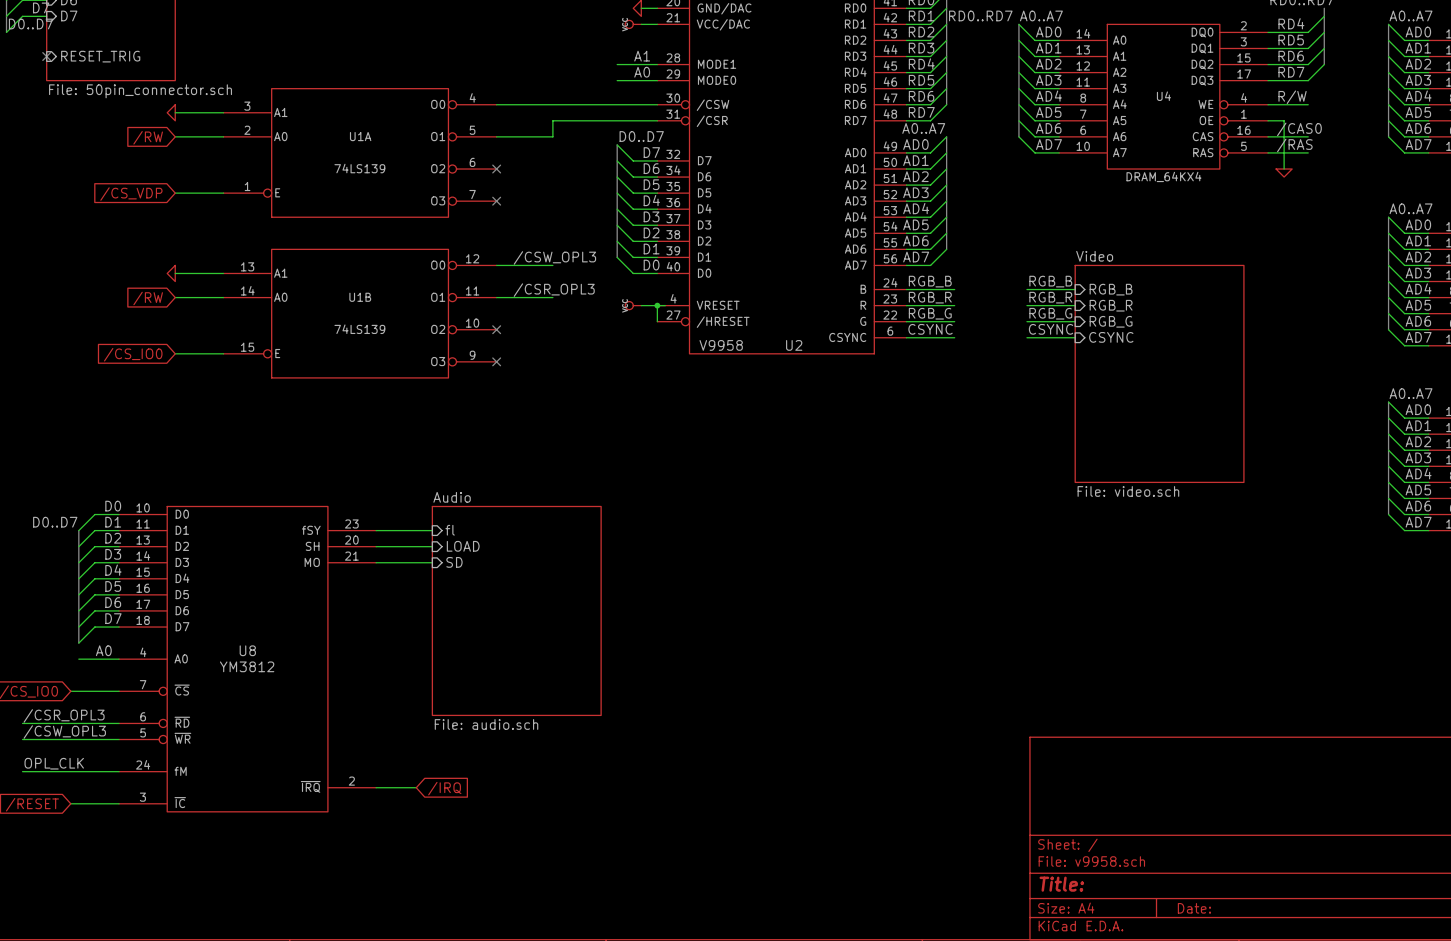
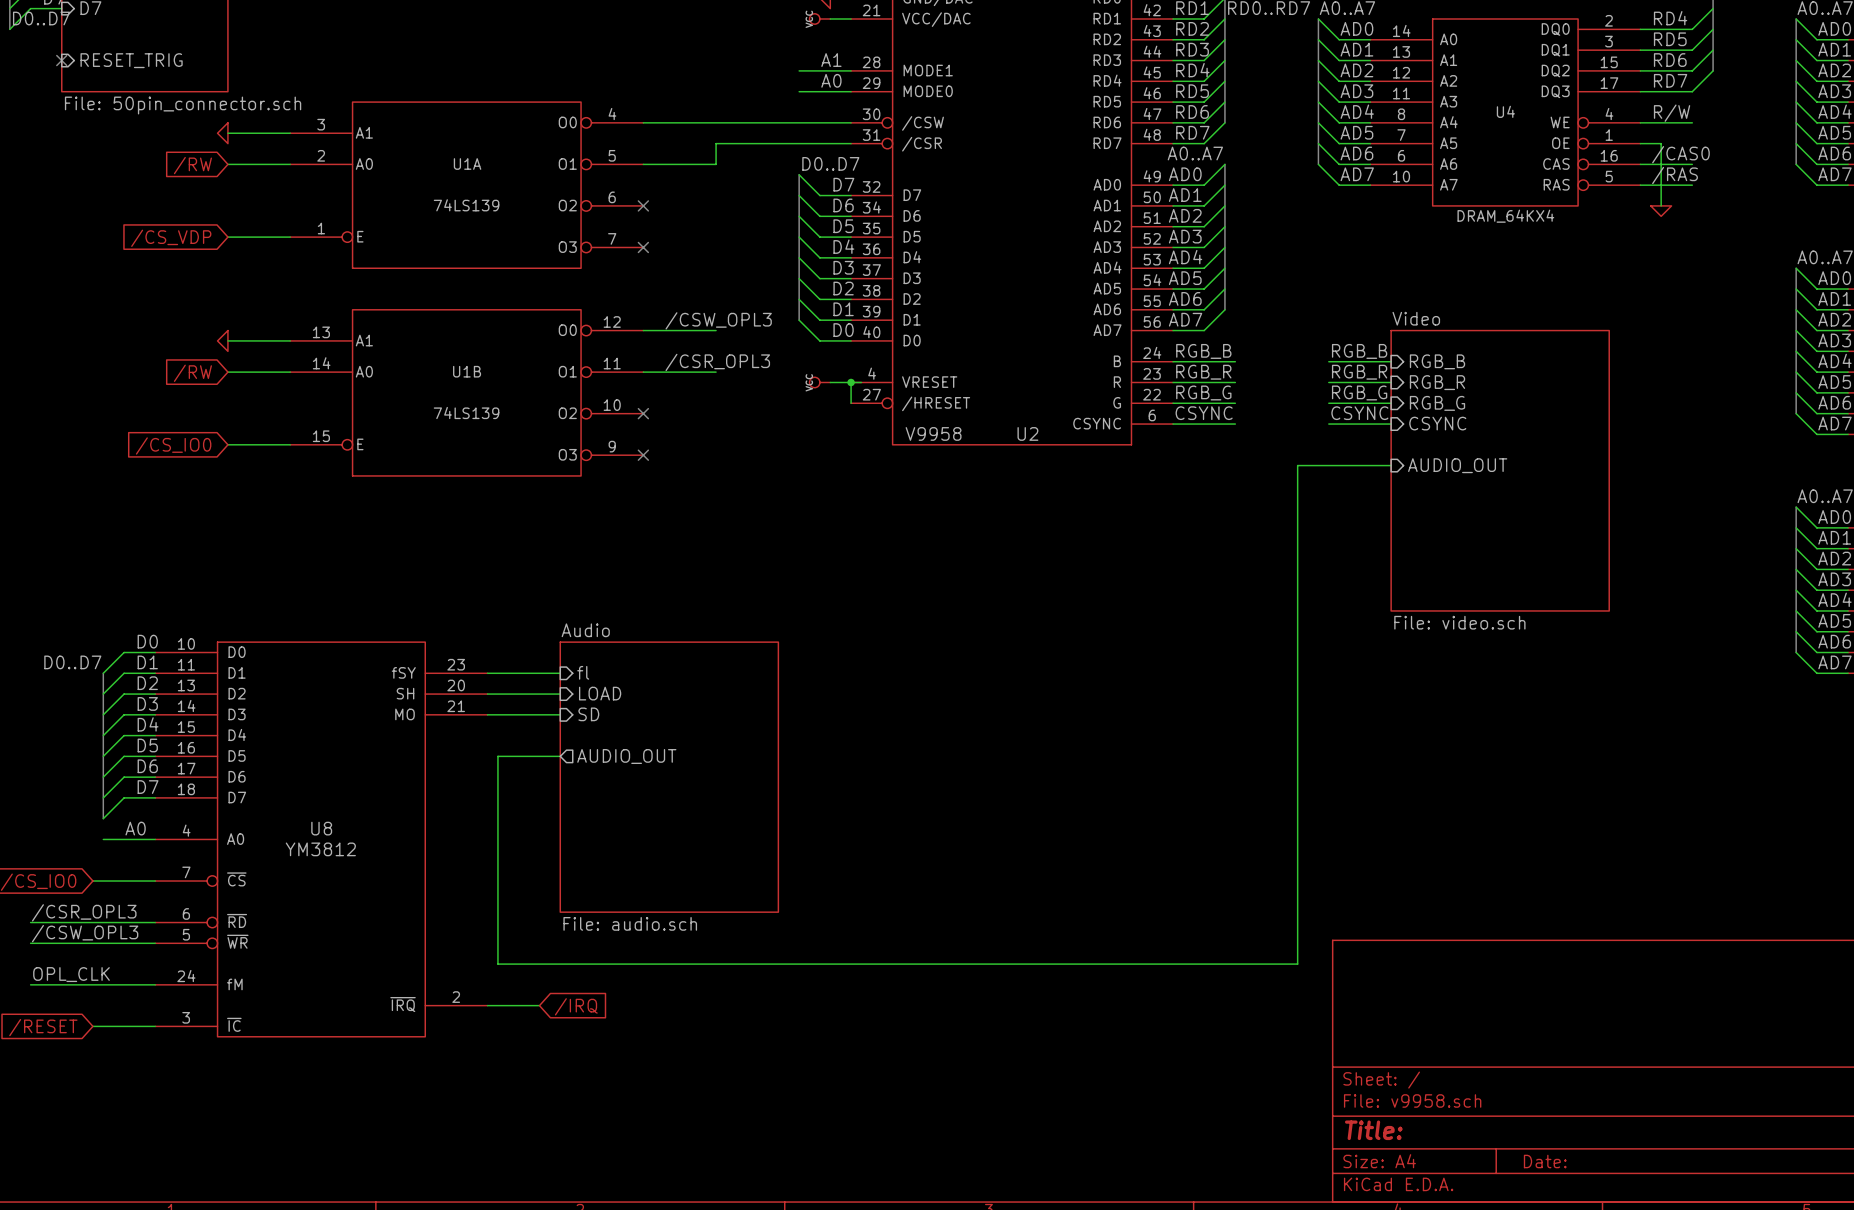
wire: none -> (1391, 465) (1297, 465) (1297, 964) (497, 964) (497, 756) (560, 756)
sheet pin: none -> AUDIO_OUT (1457, 465)
sheet pin: none -> AUDIO_OUT (626, 756)

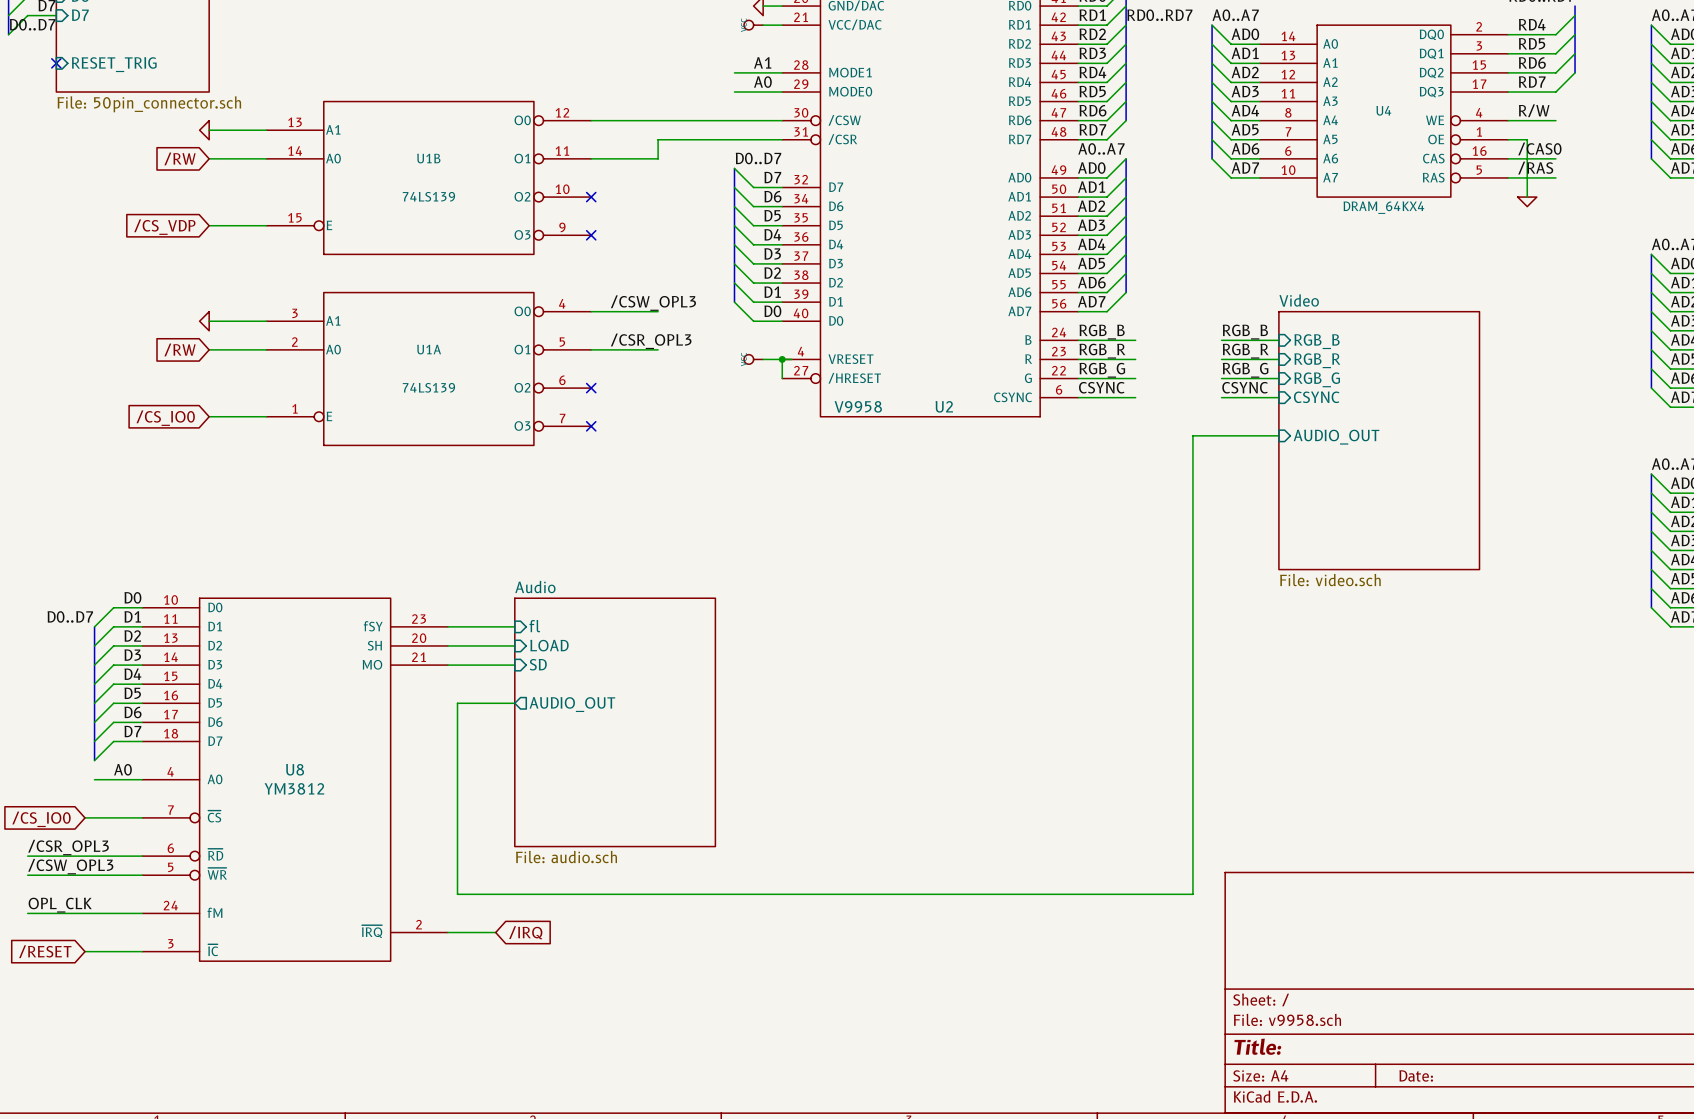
U1A position: (466, 185) -> (428, 368)
U1B position: (466, 392) -> (428, 177)

